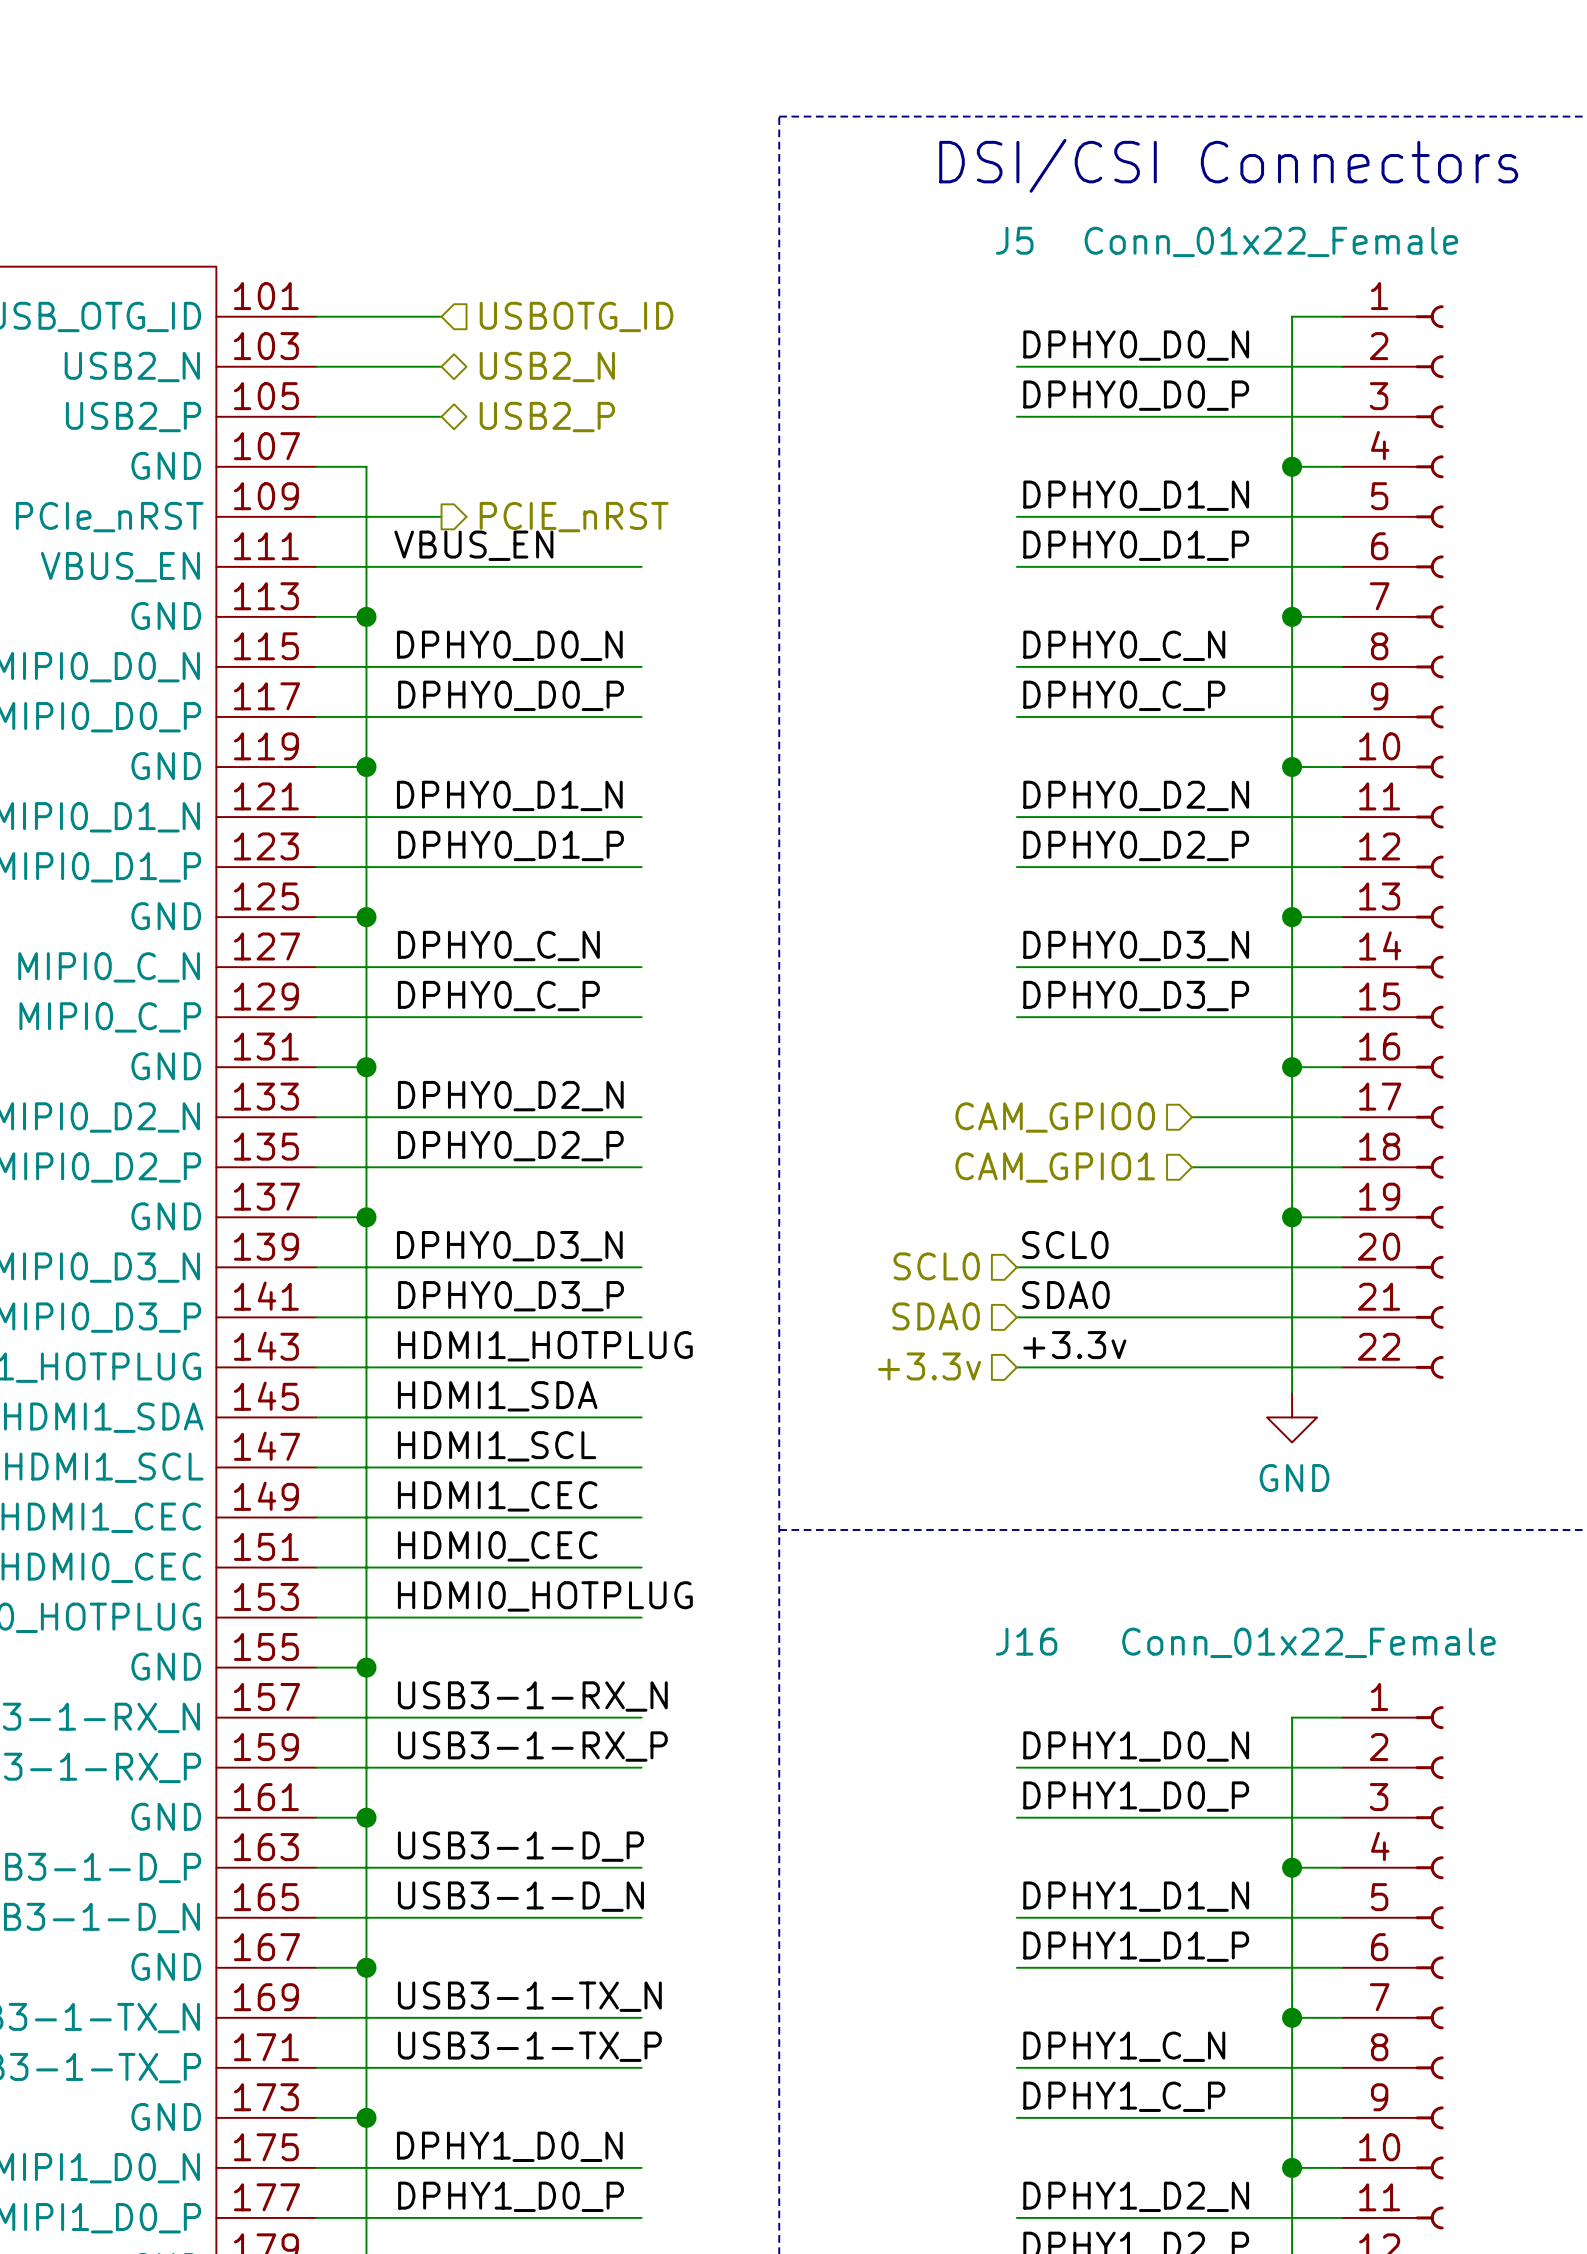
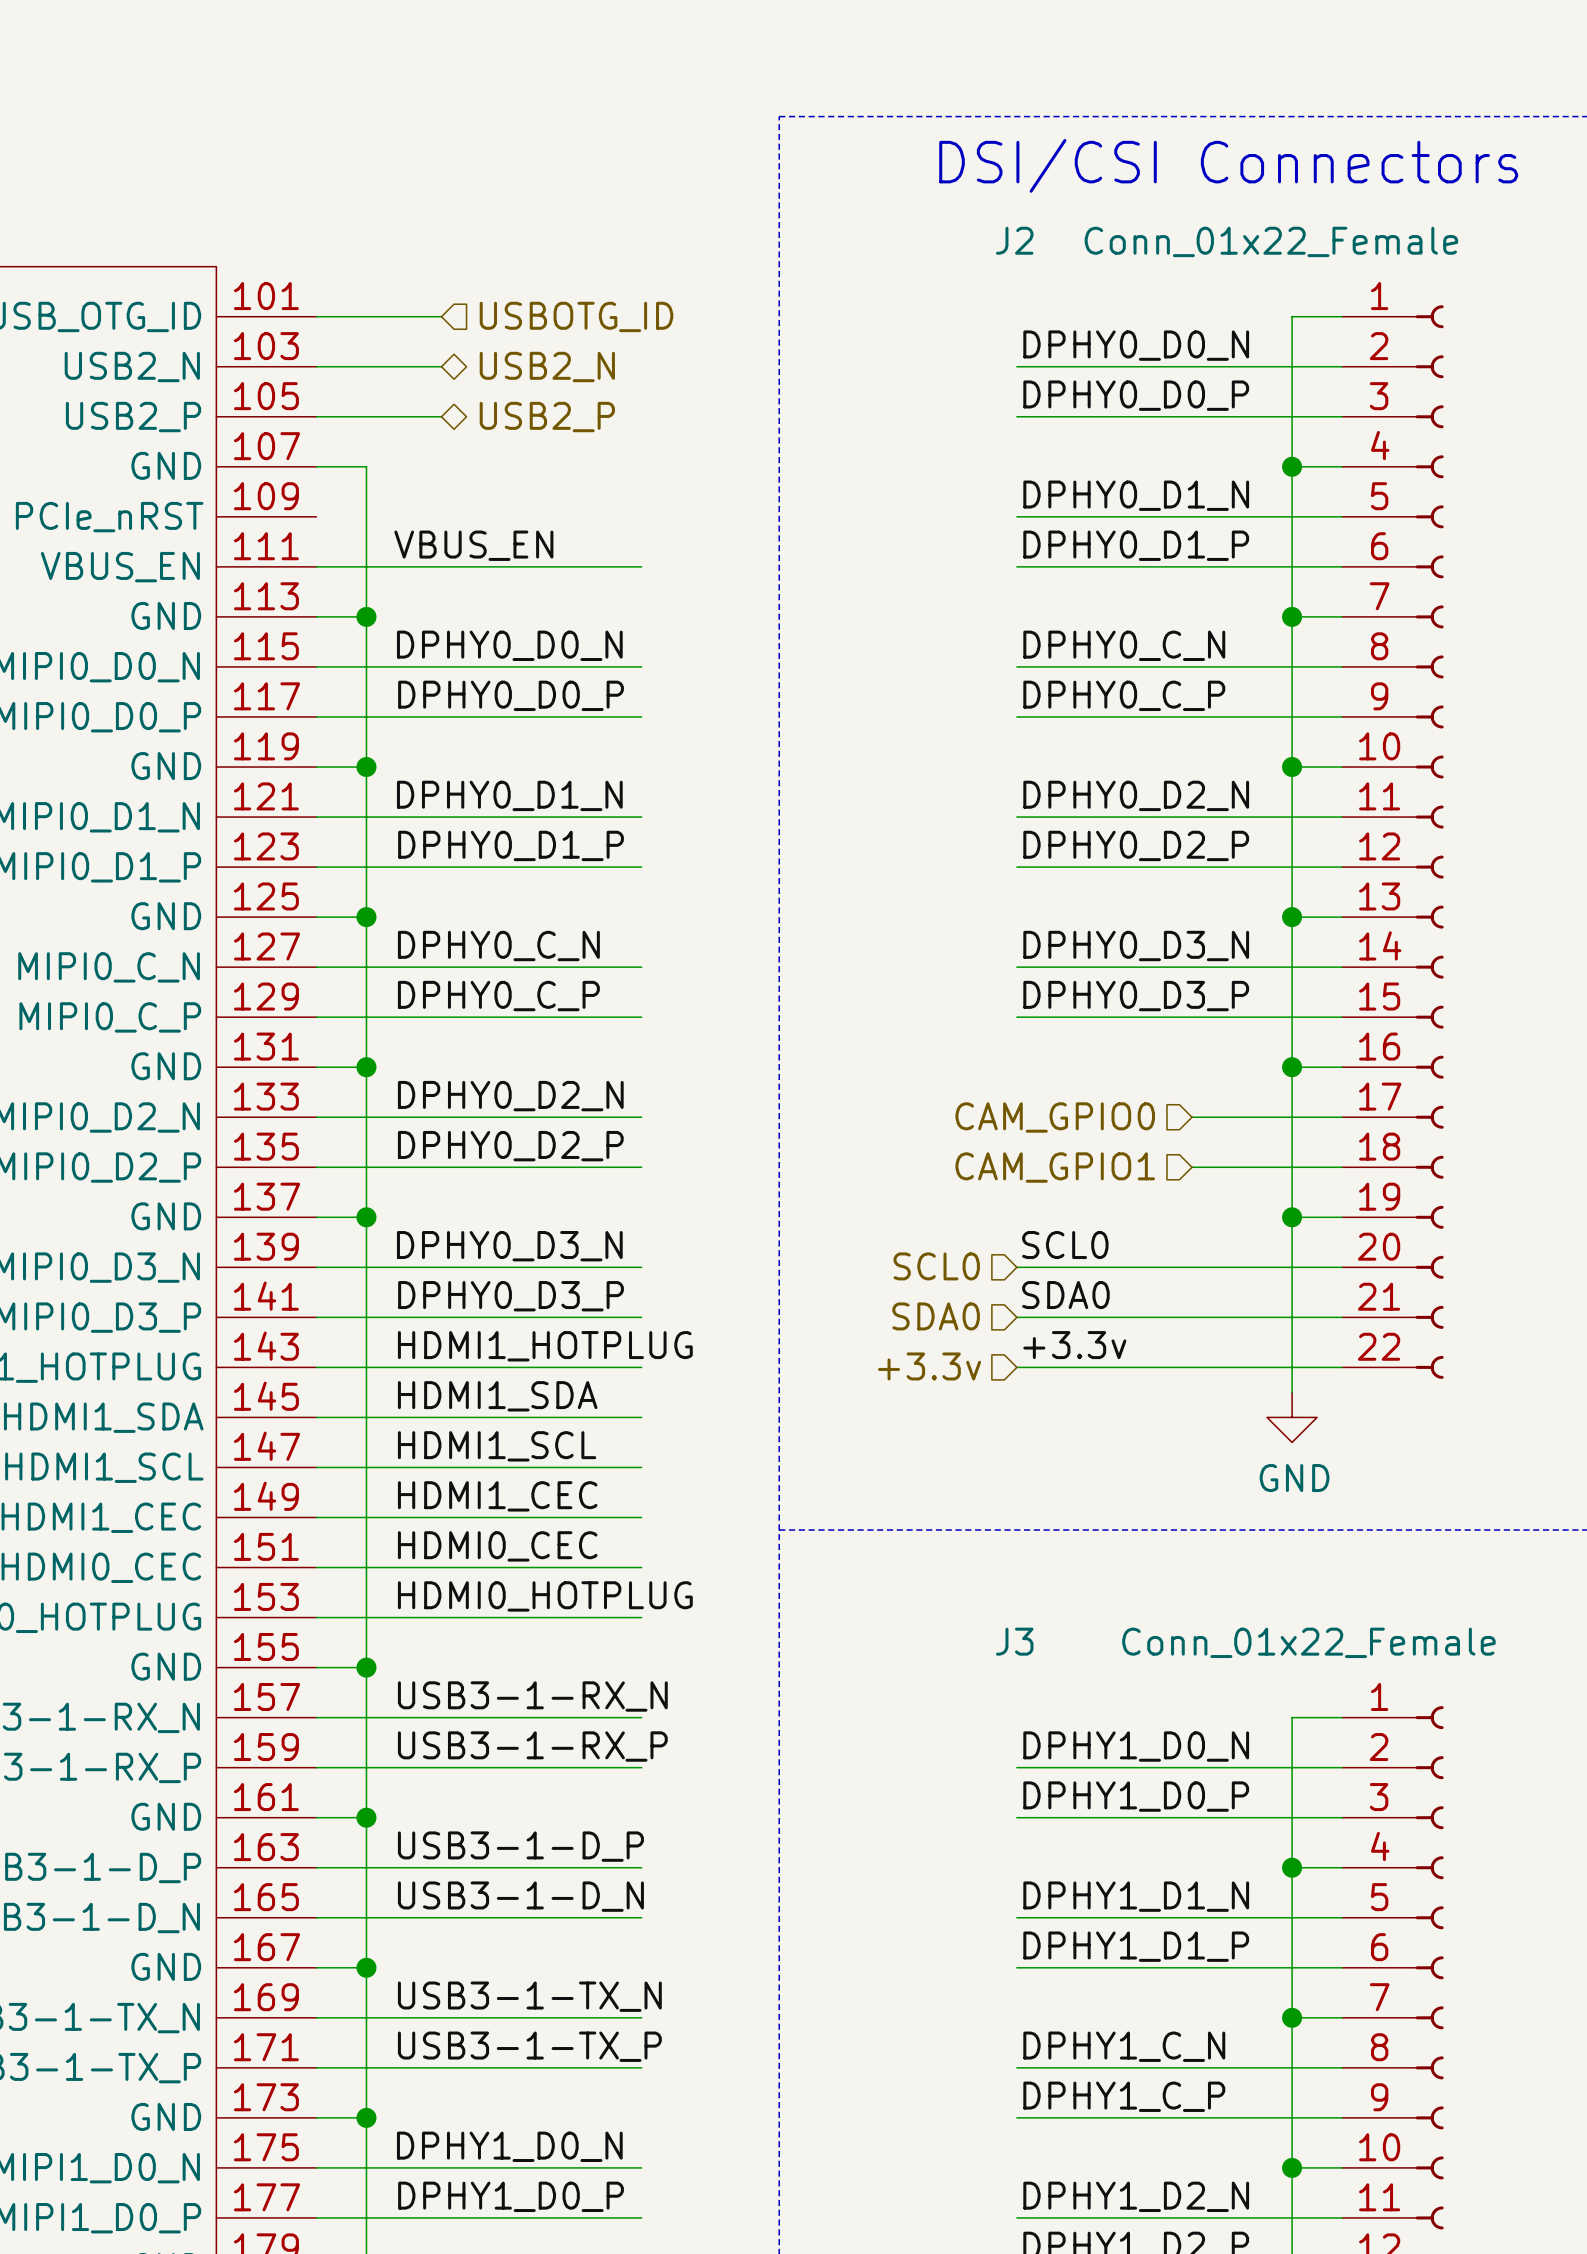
J5 name: J5 (1014, 240) -> J2 (1014, 240)
wire: (316, 516) (441, 516) -> none
hierarchical label: PCIE_nRST (574, 517) -> none
J16 name: J16 (1026, 1641) -> J3 (1014, 1641)

